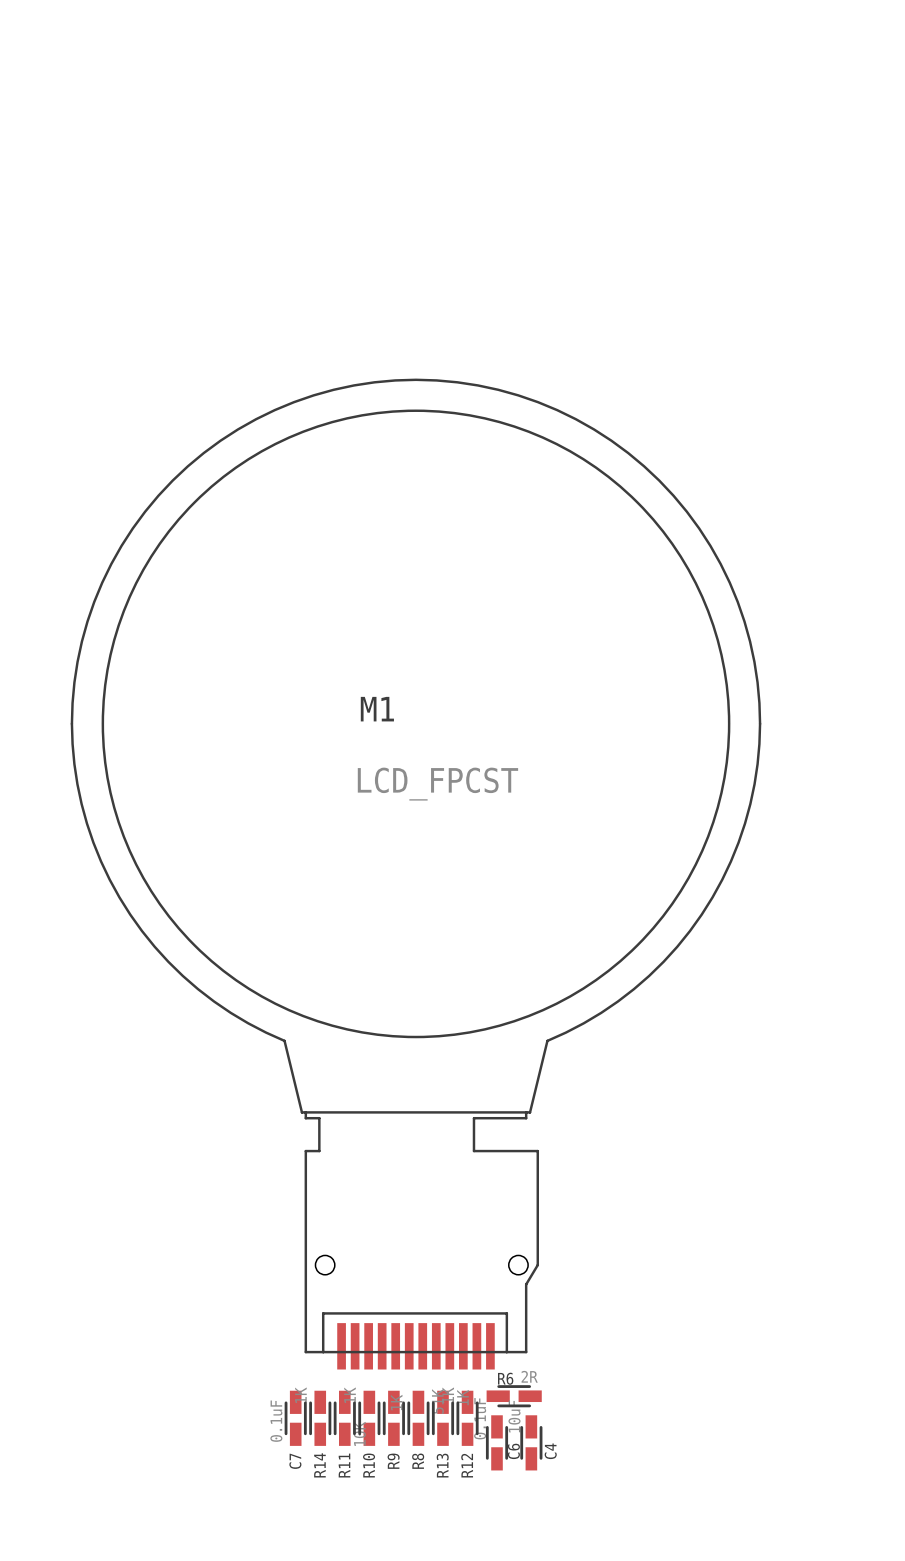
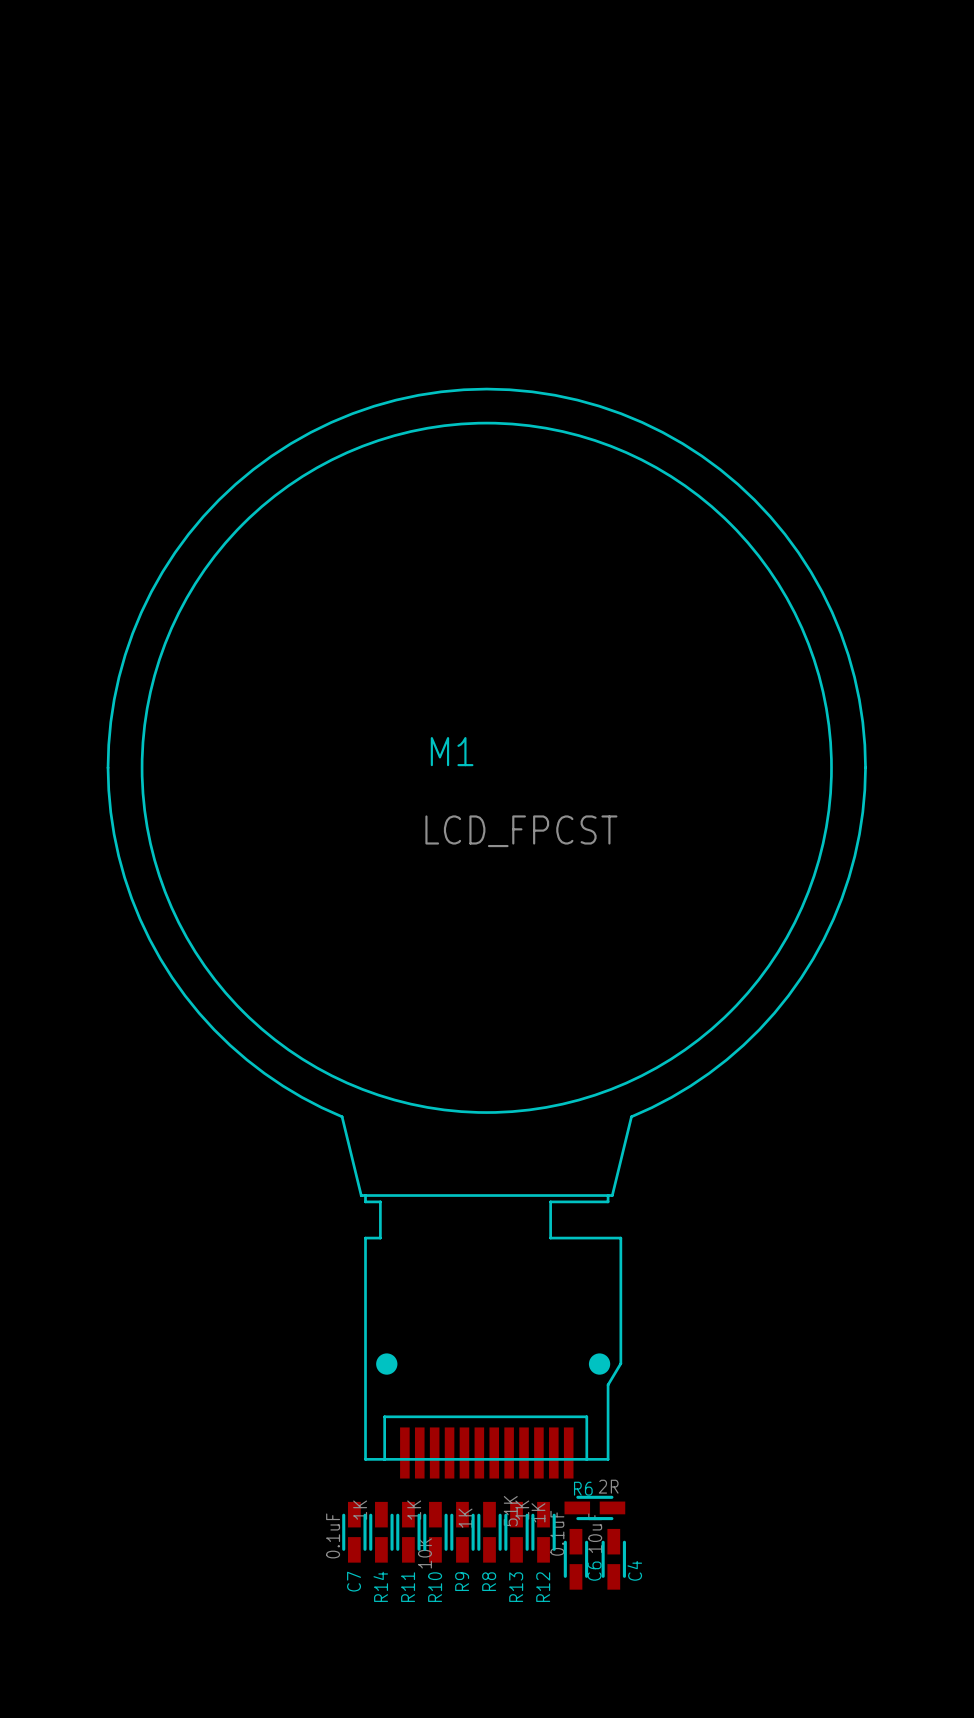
M1 footprint: [70, 378, 762, 1370] -> [106, 387, 867, 1479]

